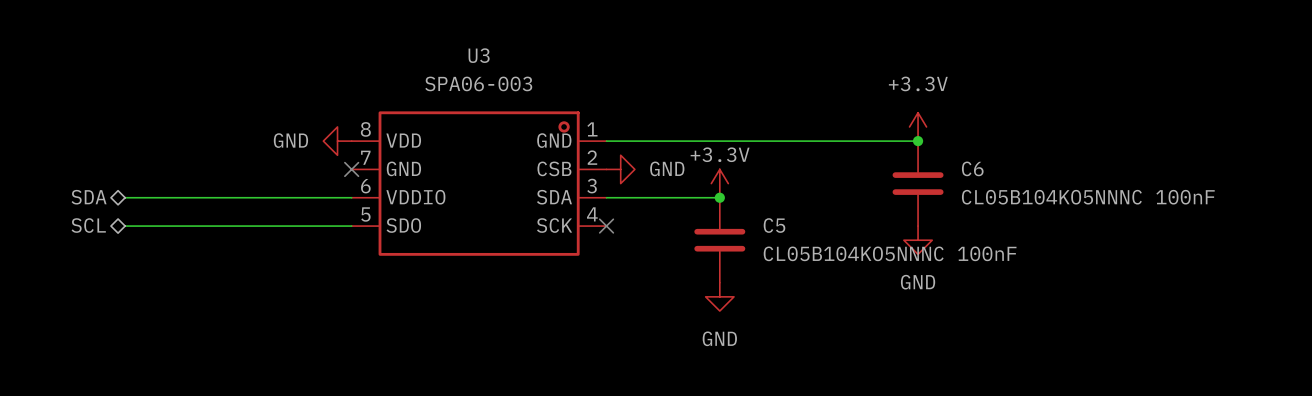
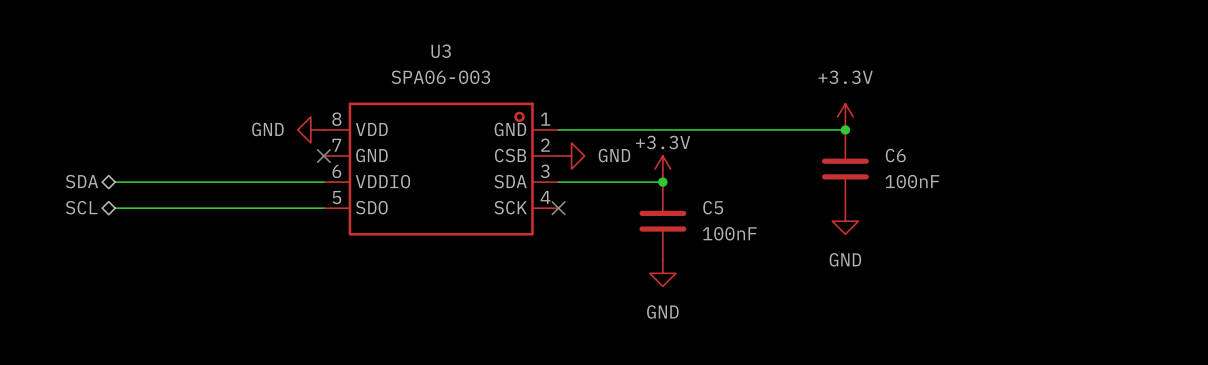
C6 value: CL05B104KO5NNNC 100nF (1088, 197) -> 100nF (912, 181)
C5 value: CL05B104KO5NNNC 100nF (890, 253) -> 100nF (729, 233)

